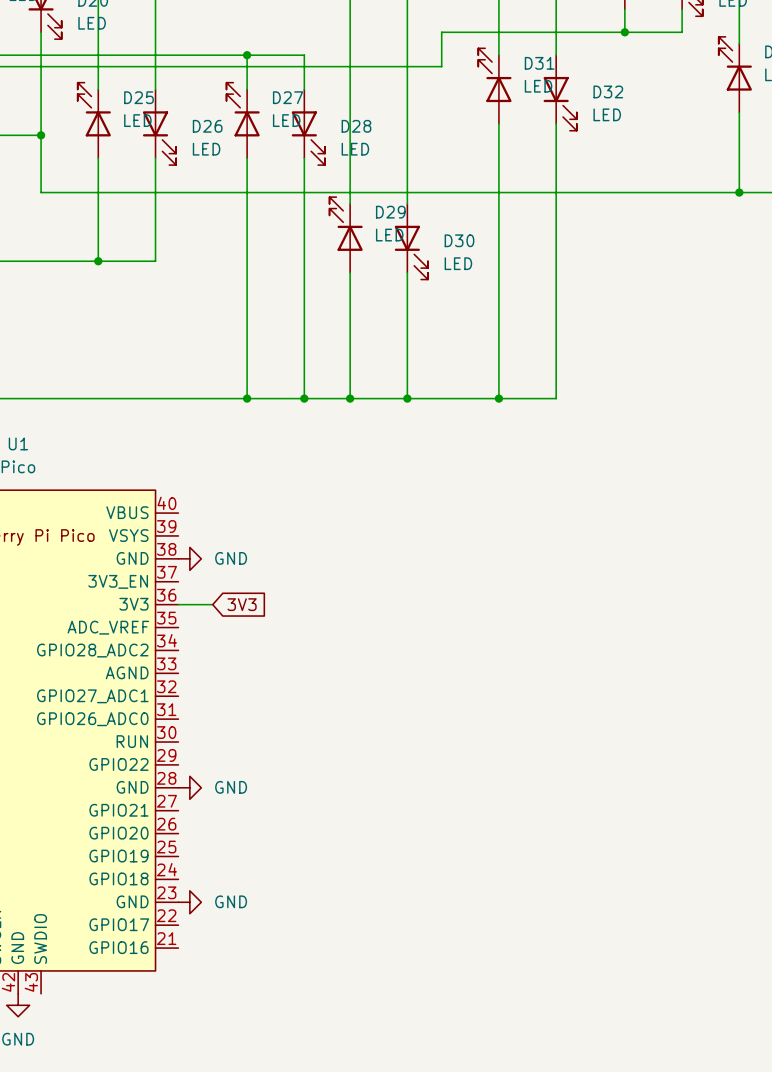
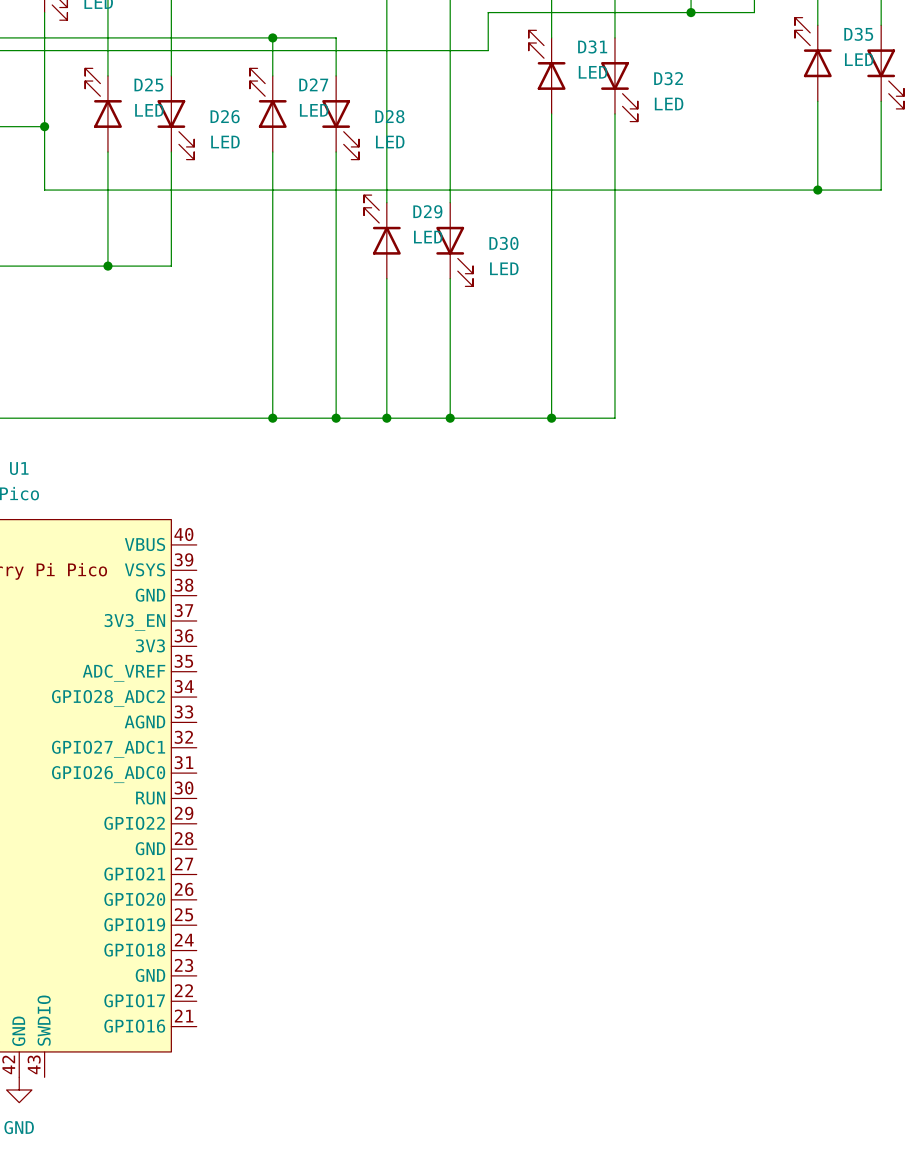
power symbol: GND (189, 558) -> none
wire: (178, 604) (212, 604) -> none
global label: 3V3 (242, 604) -> none
power symbol: GND (189, 787) -> none
power symbol: GND (189, 902) -> none

